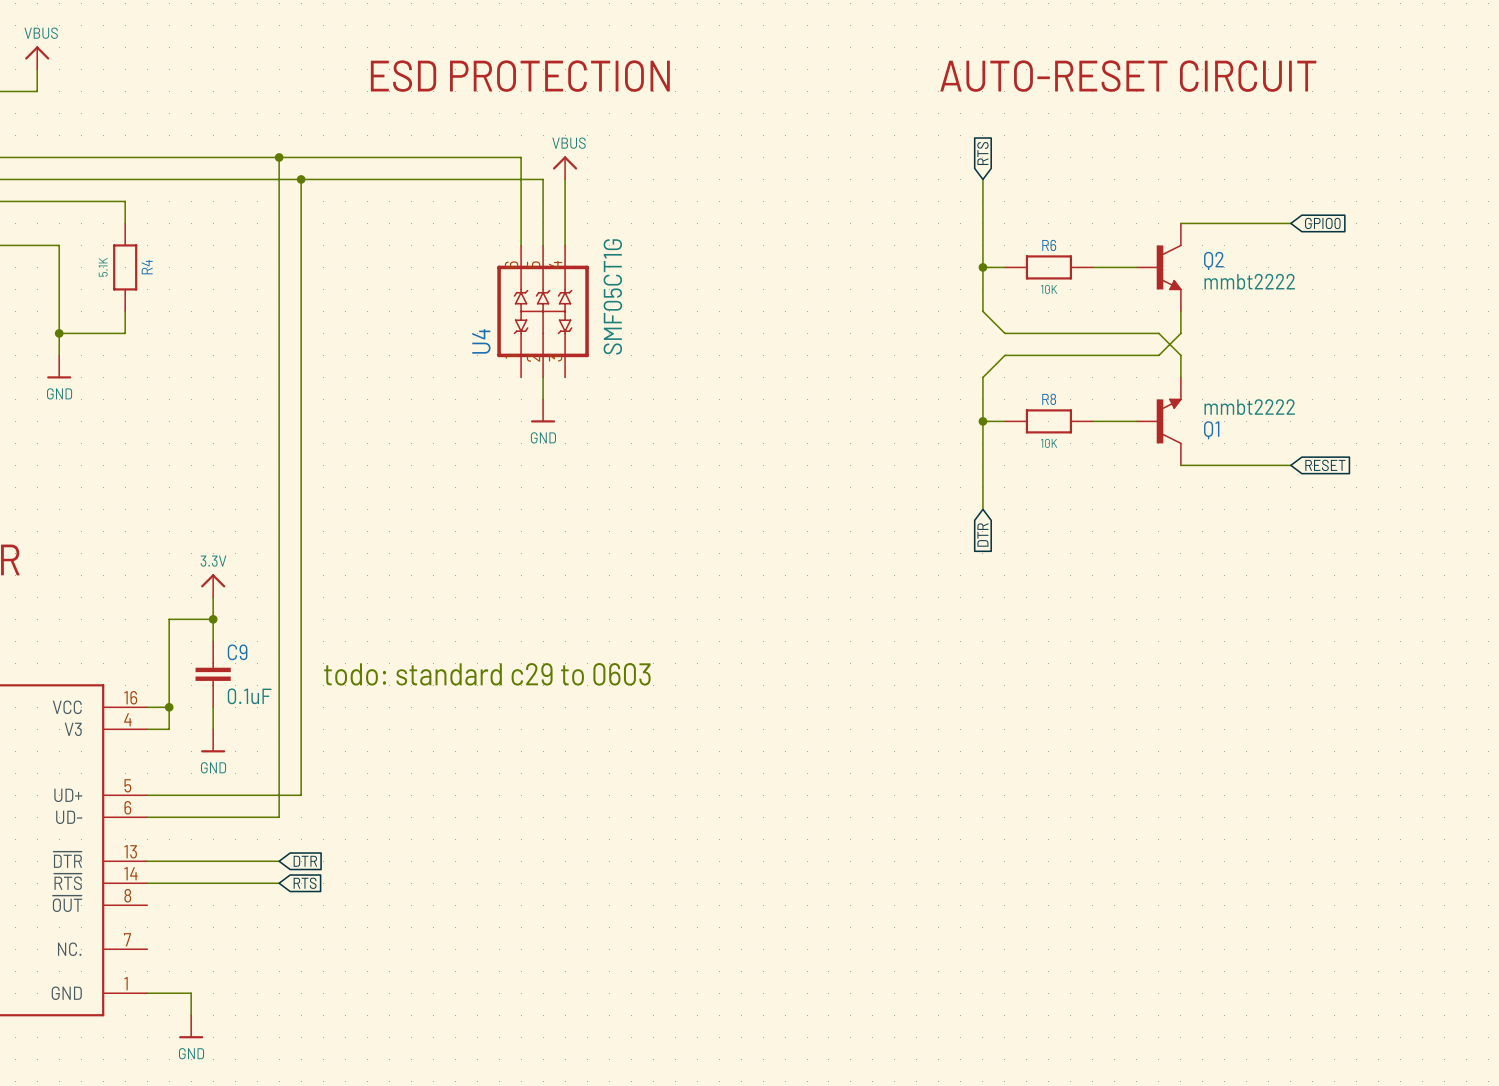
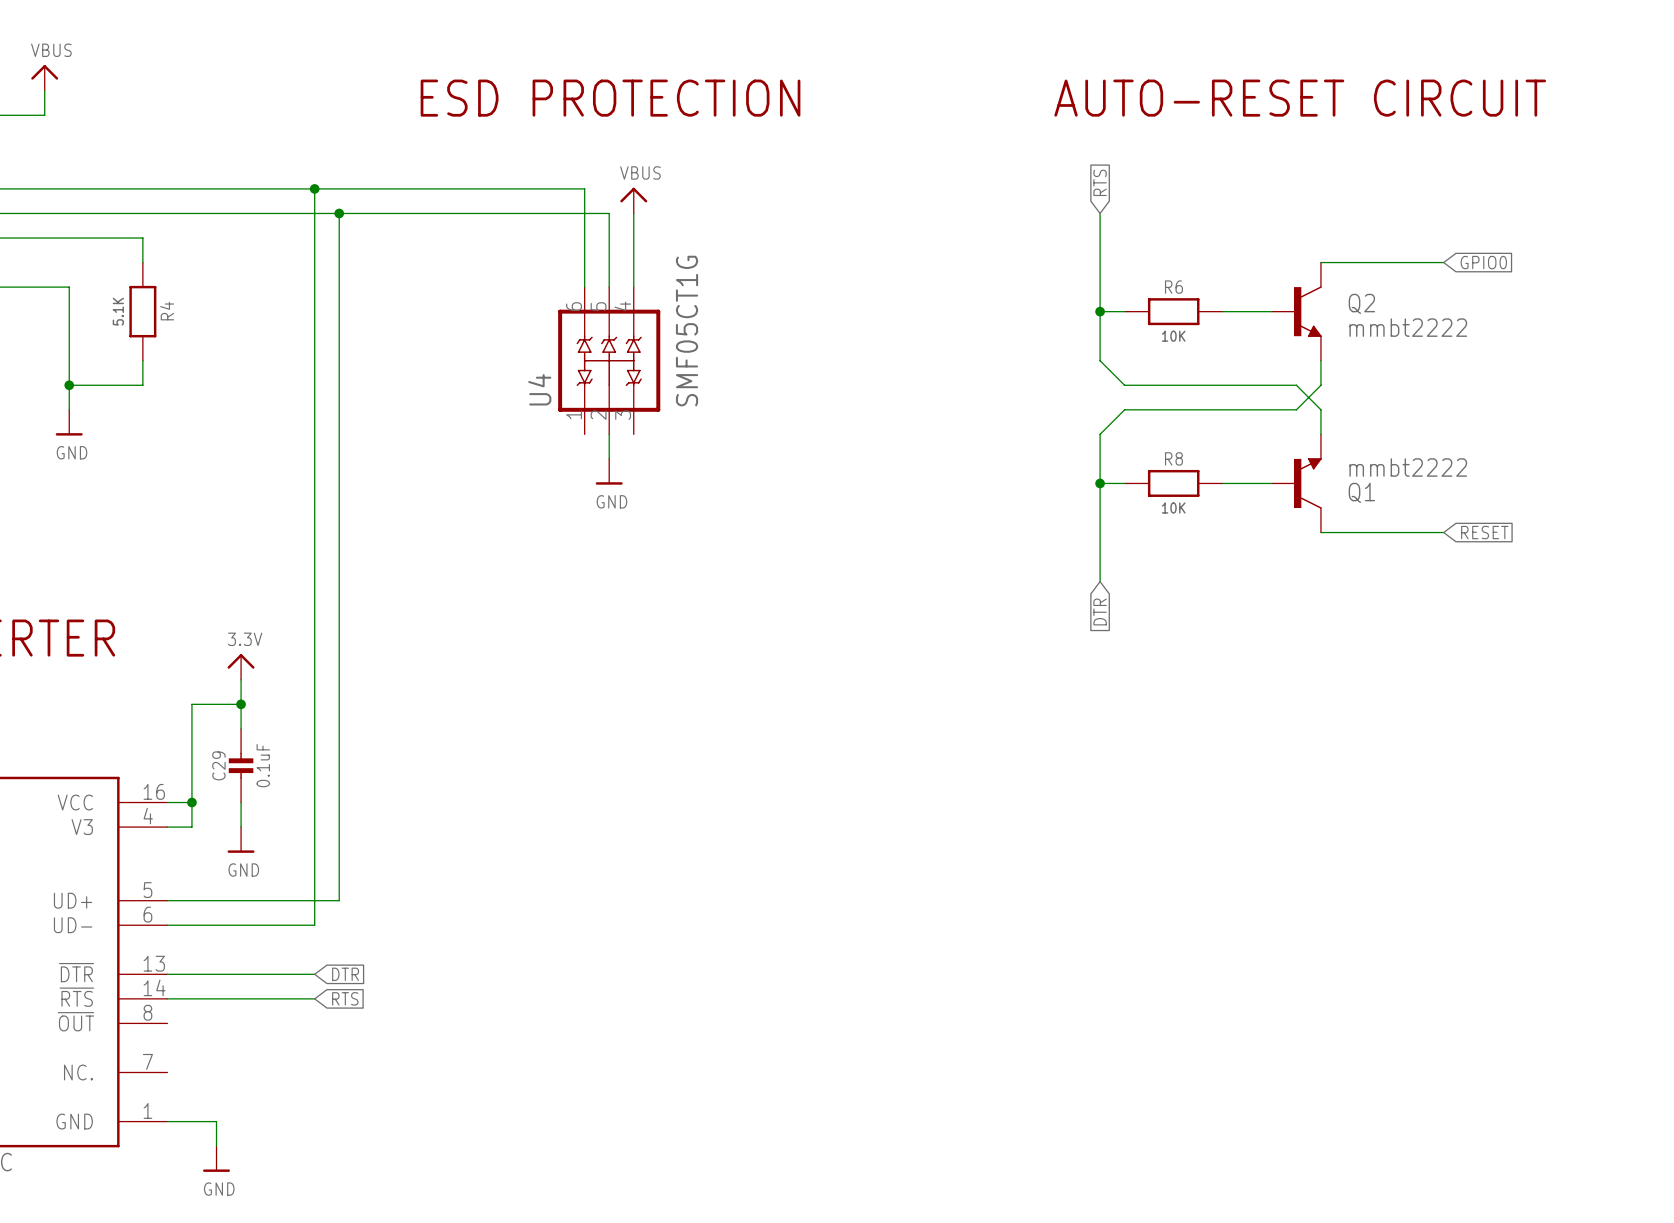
C9: 0.1uF (213, 674) -> none
C29: none -> 0.1uF (241, 765)
text: todo: standard c29 to 0603 (487, 674) -> none

